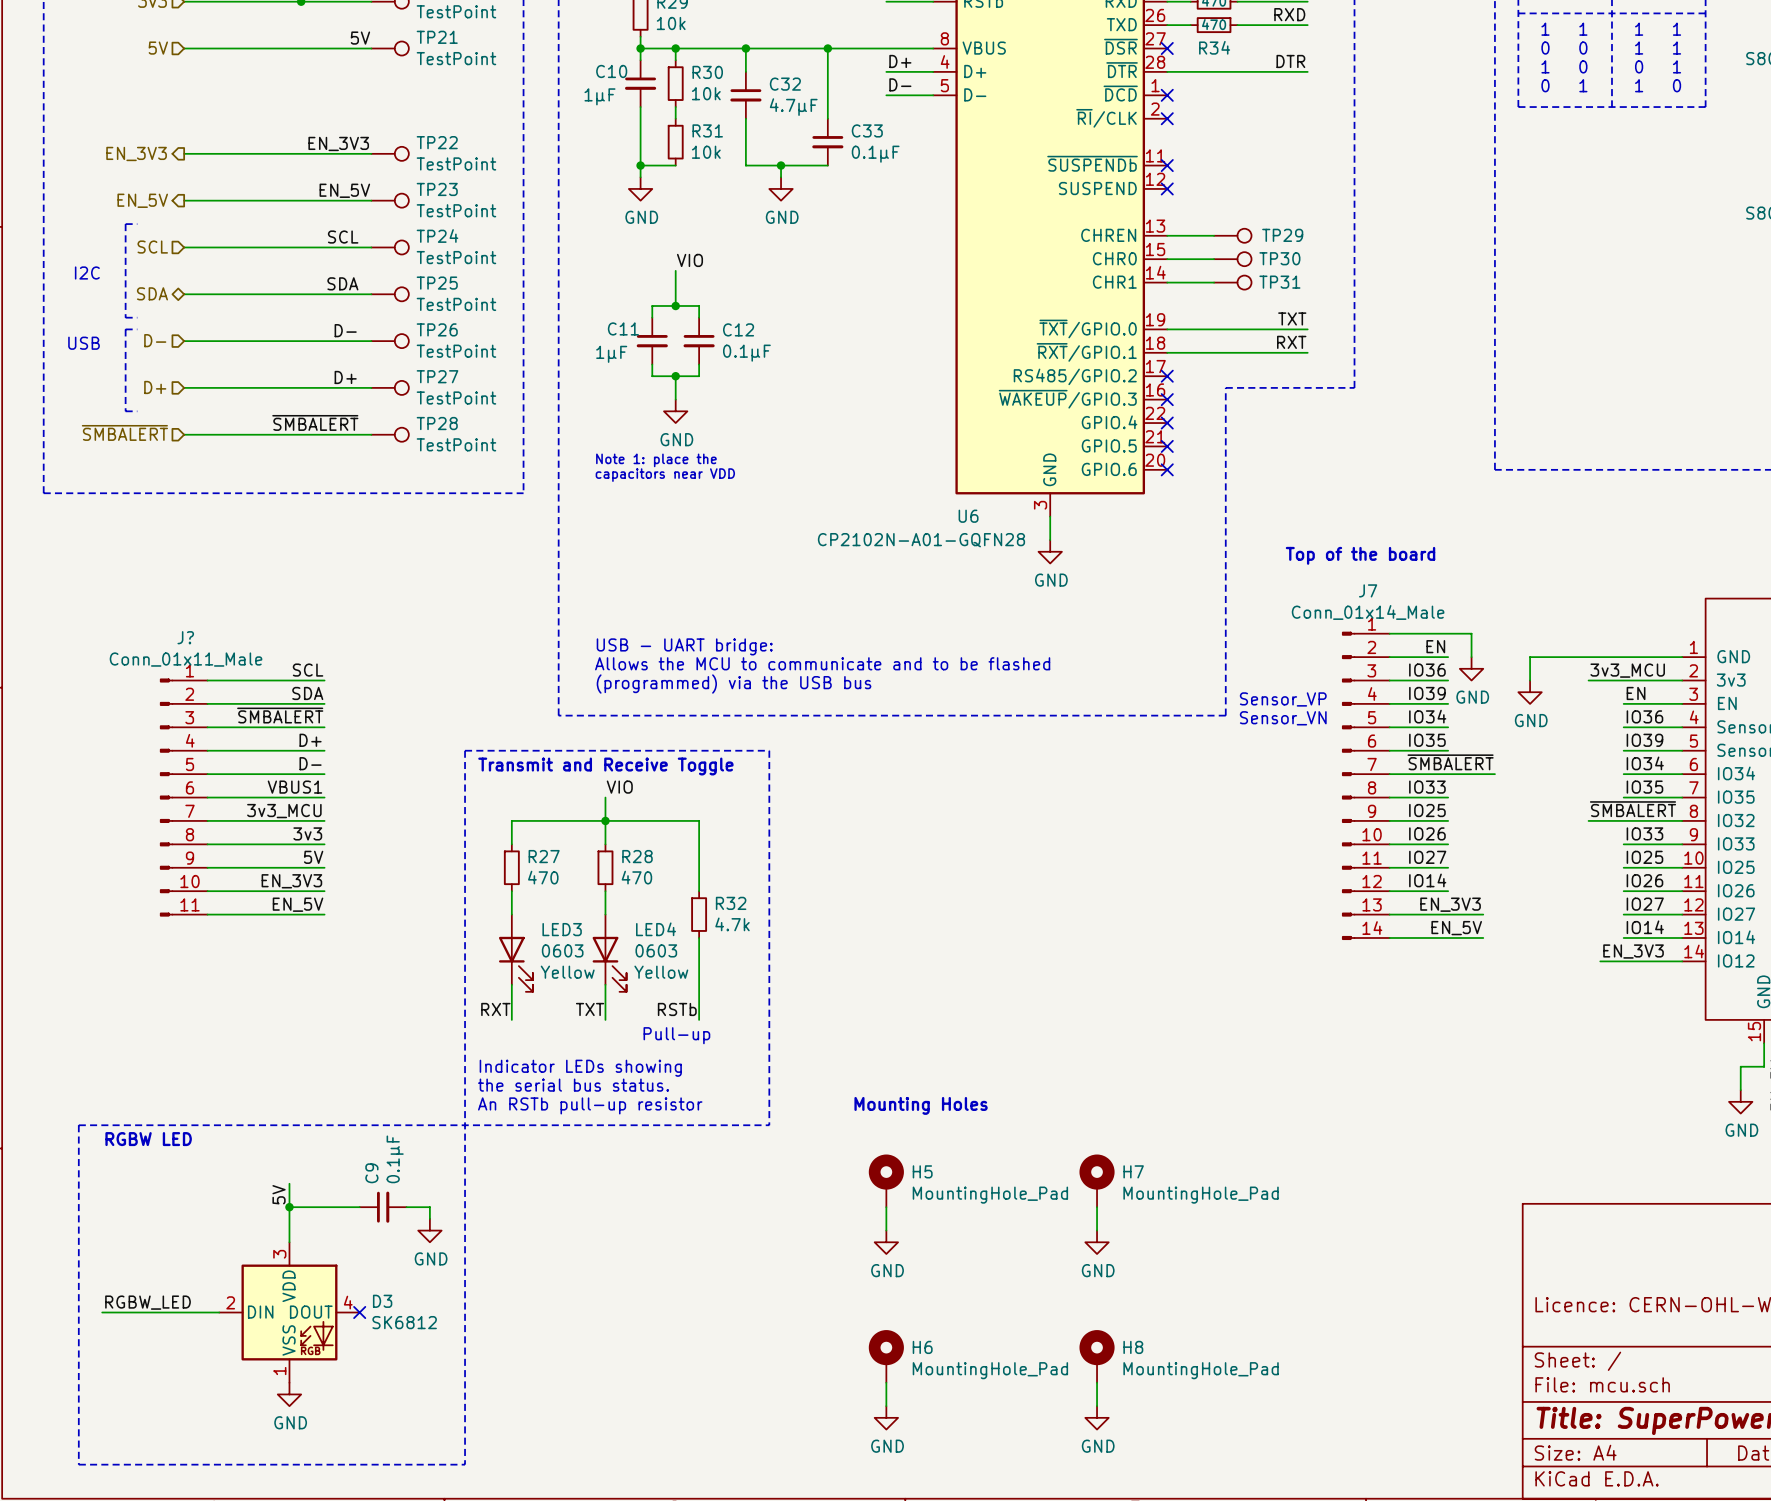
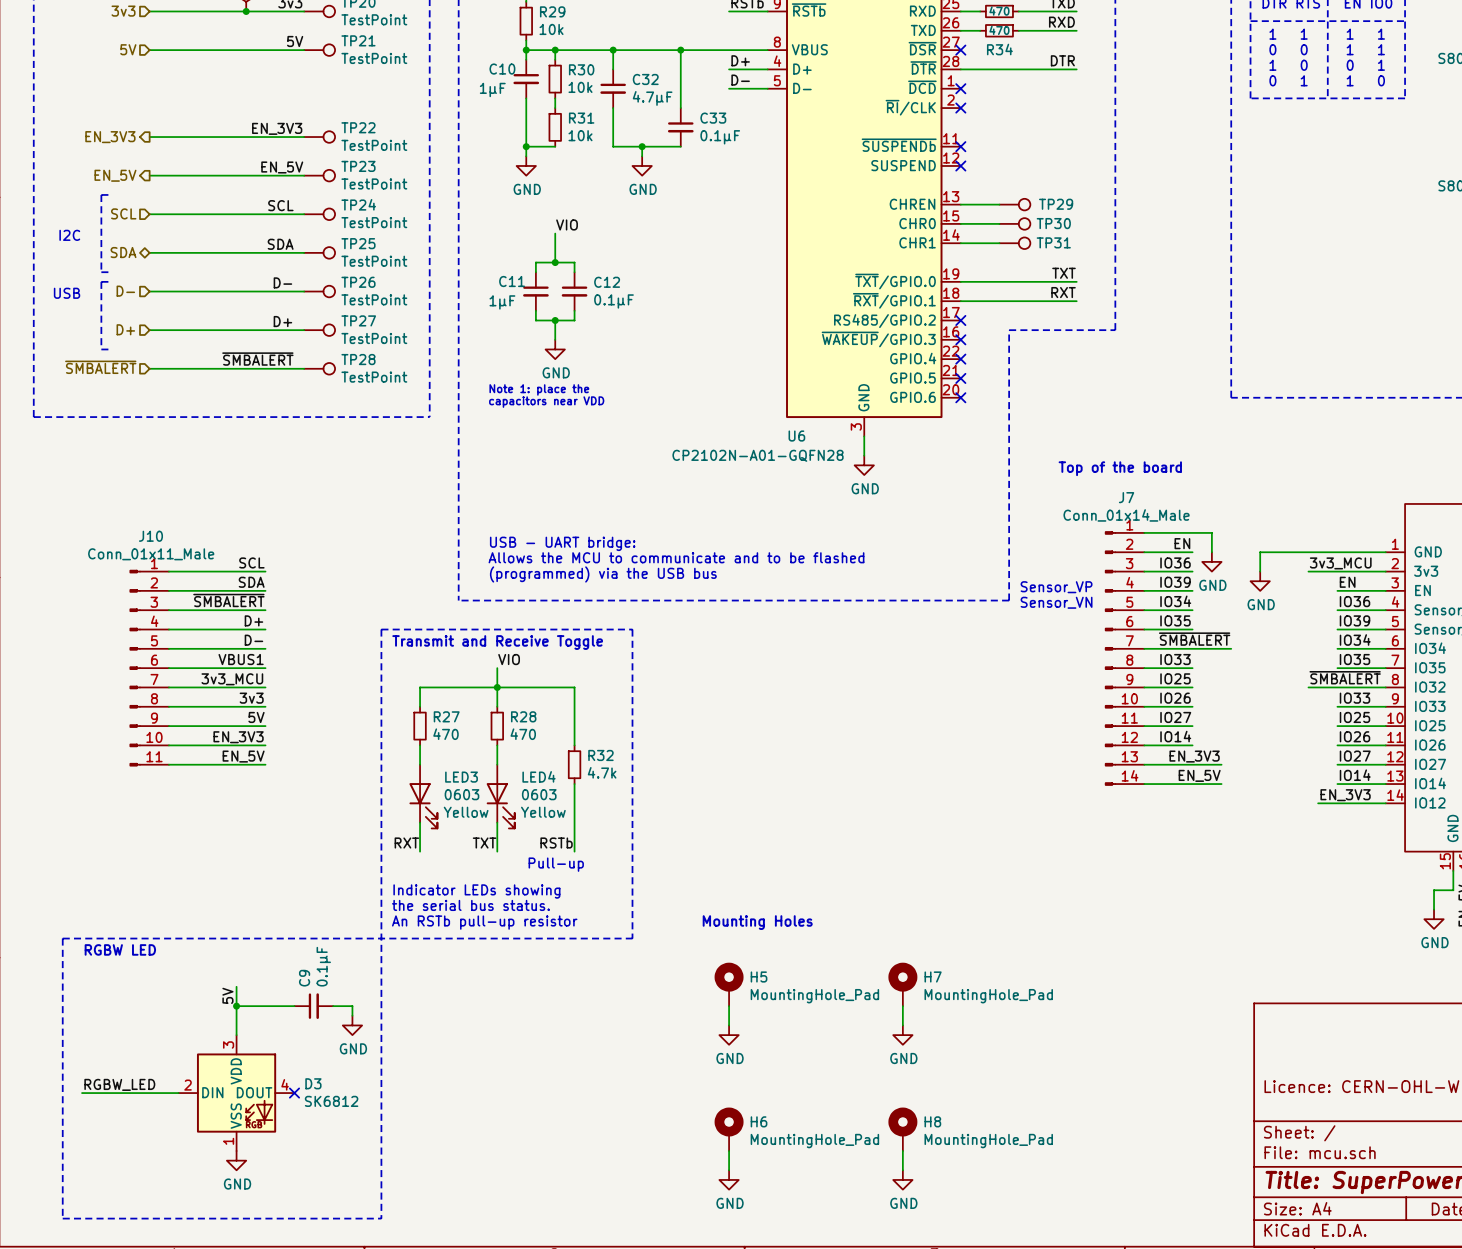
J? name: J? (185, 637) -> J10 (150, 536)

